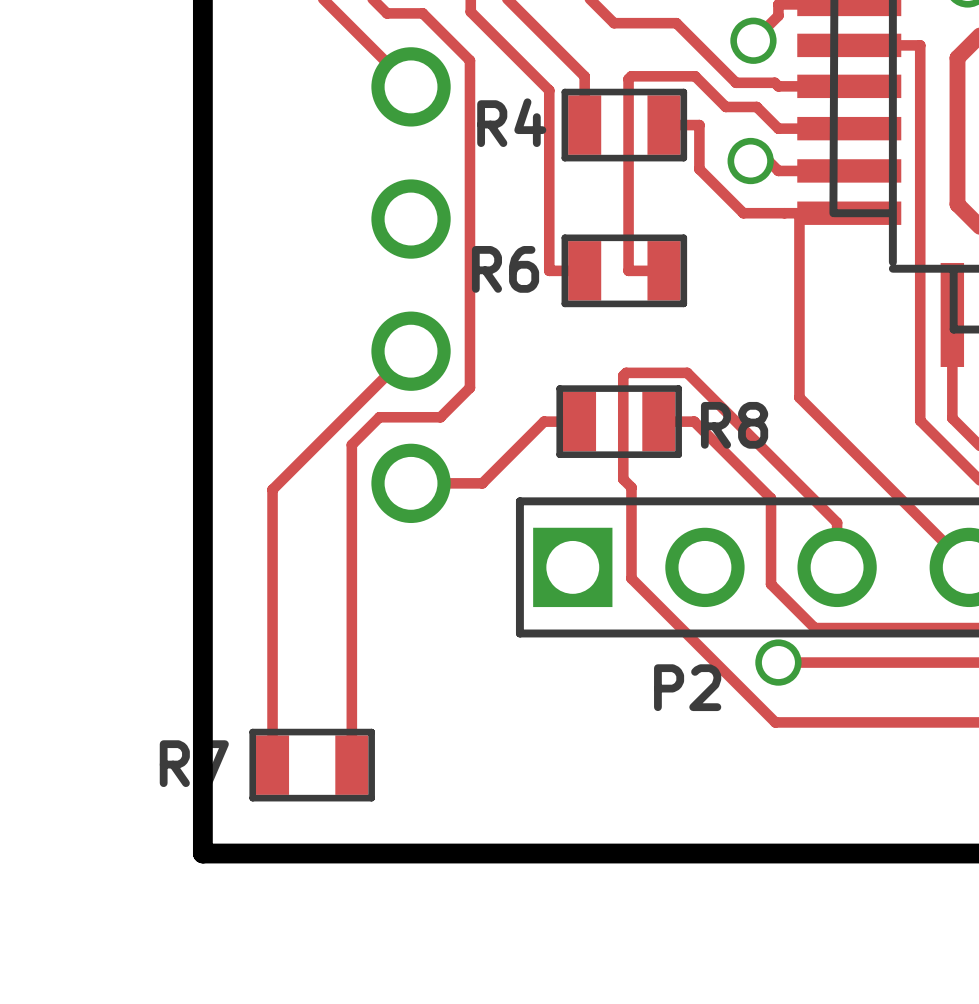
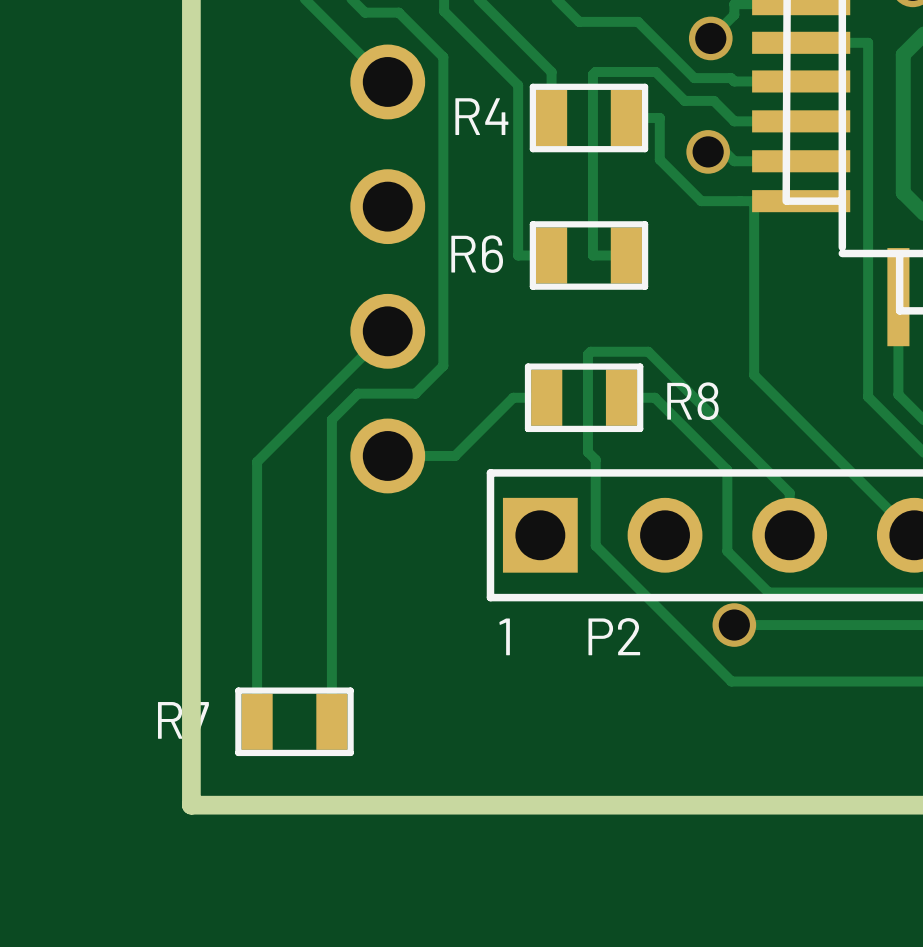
text: none -> 1 (504, 636)
P2 name position: P2 (687, 687) -> P2 (614, 636)

